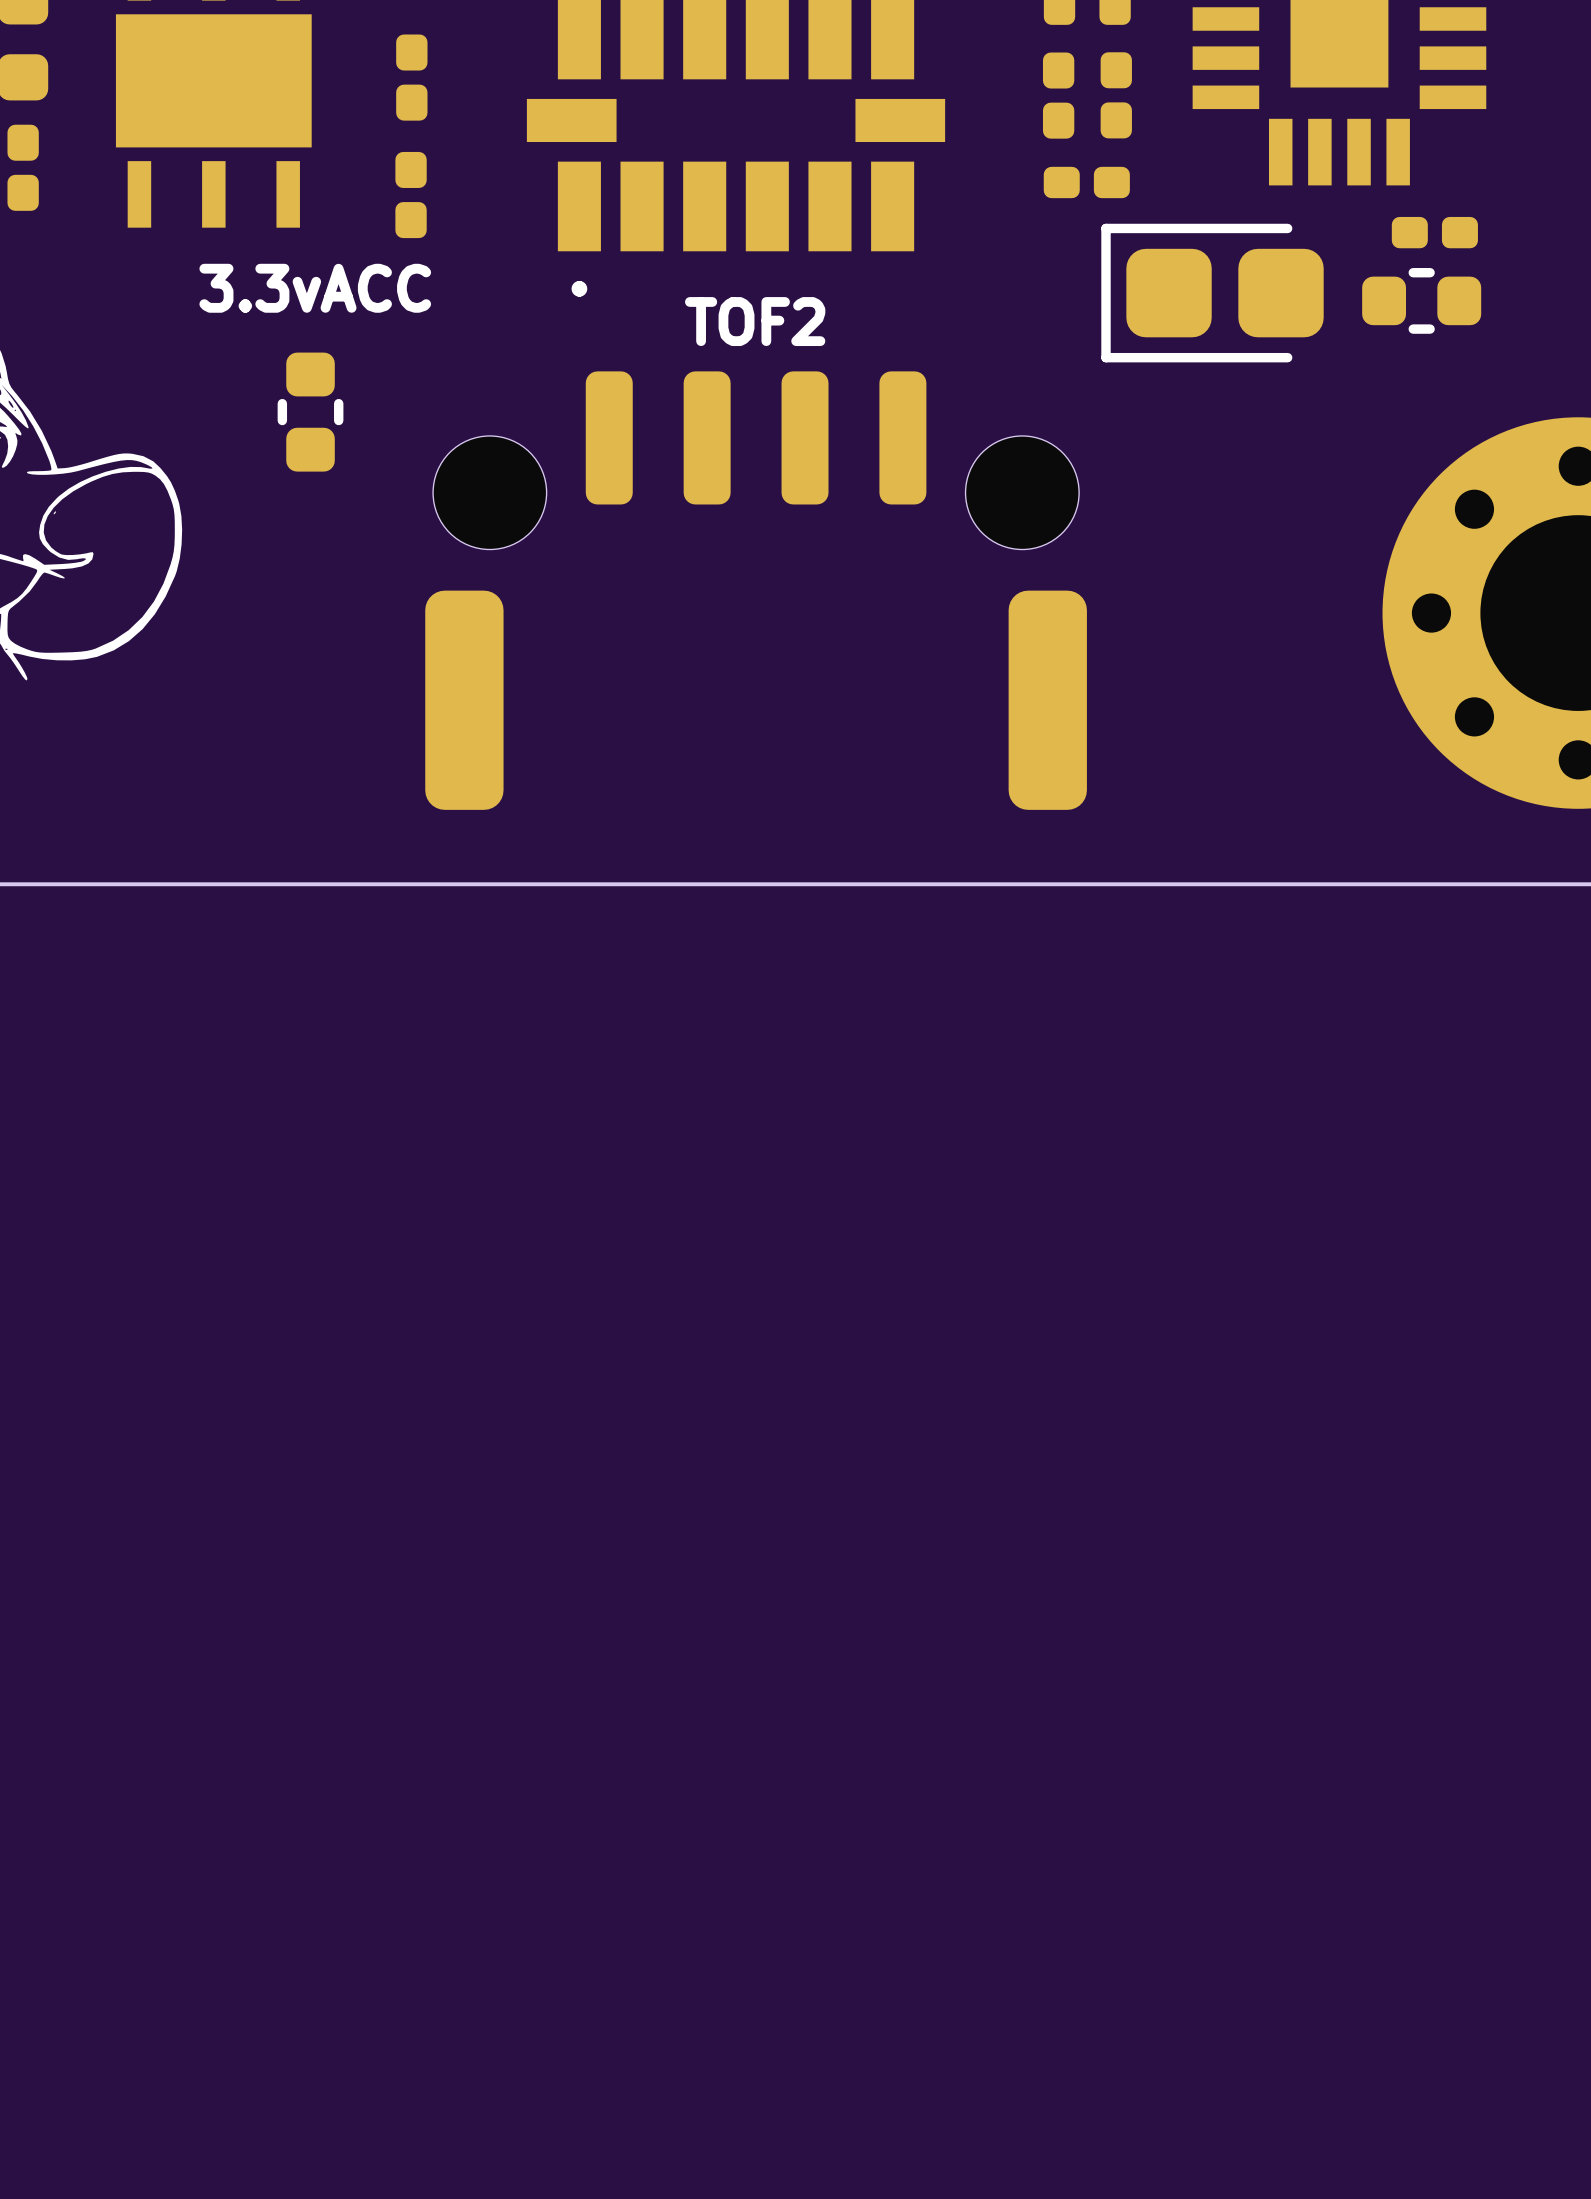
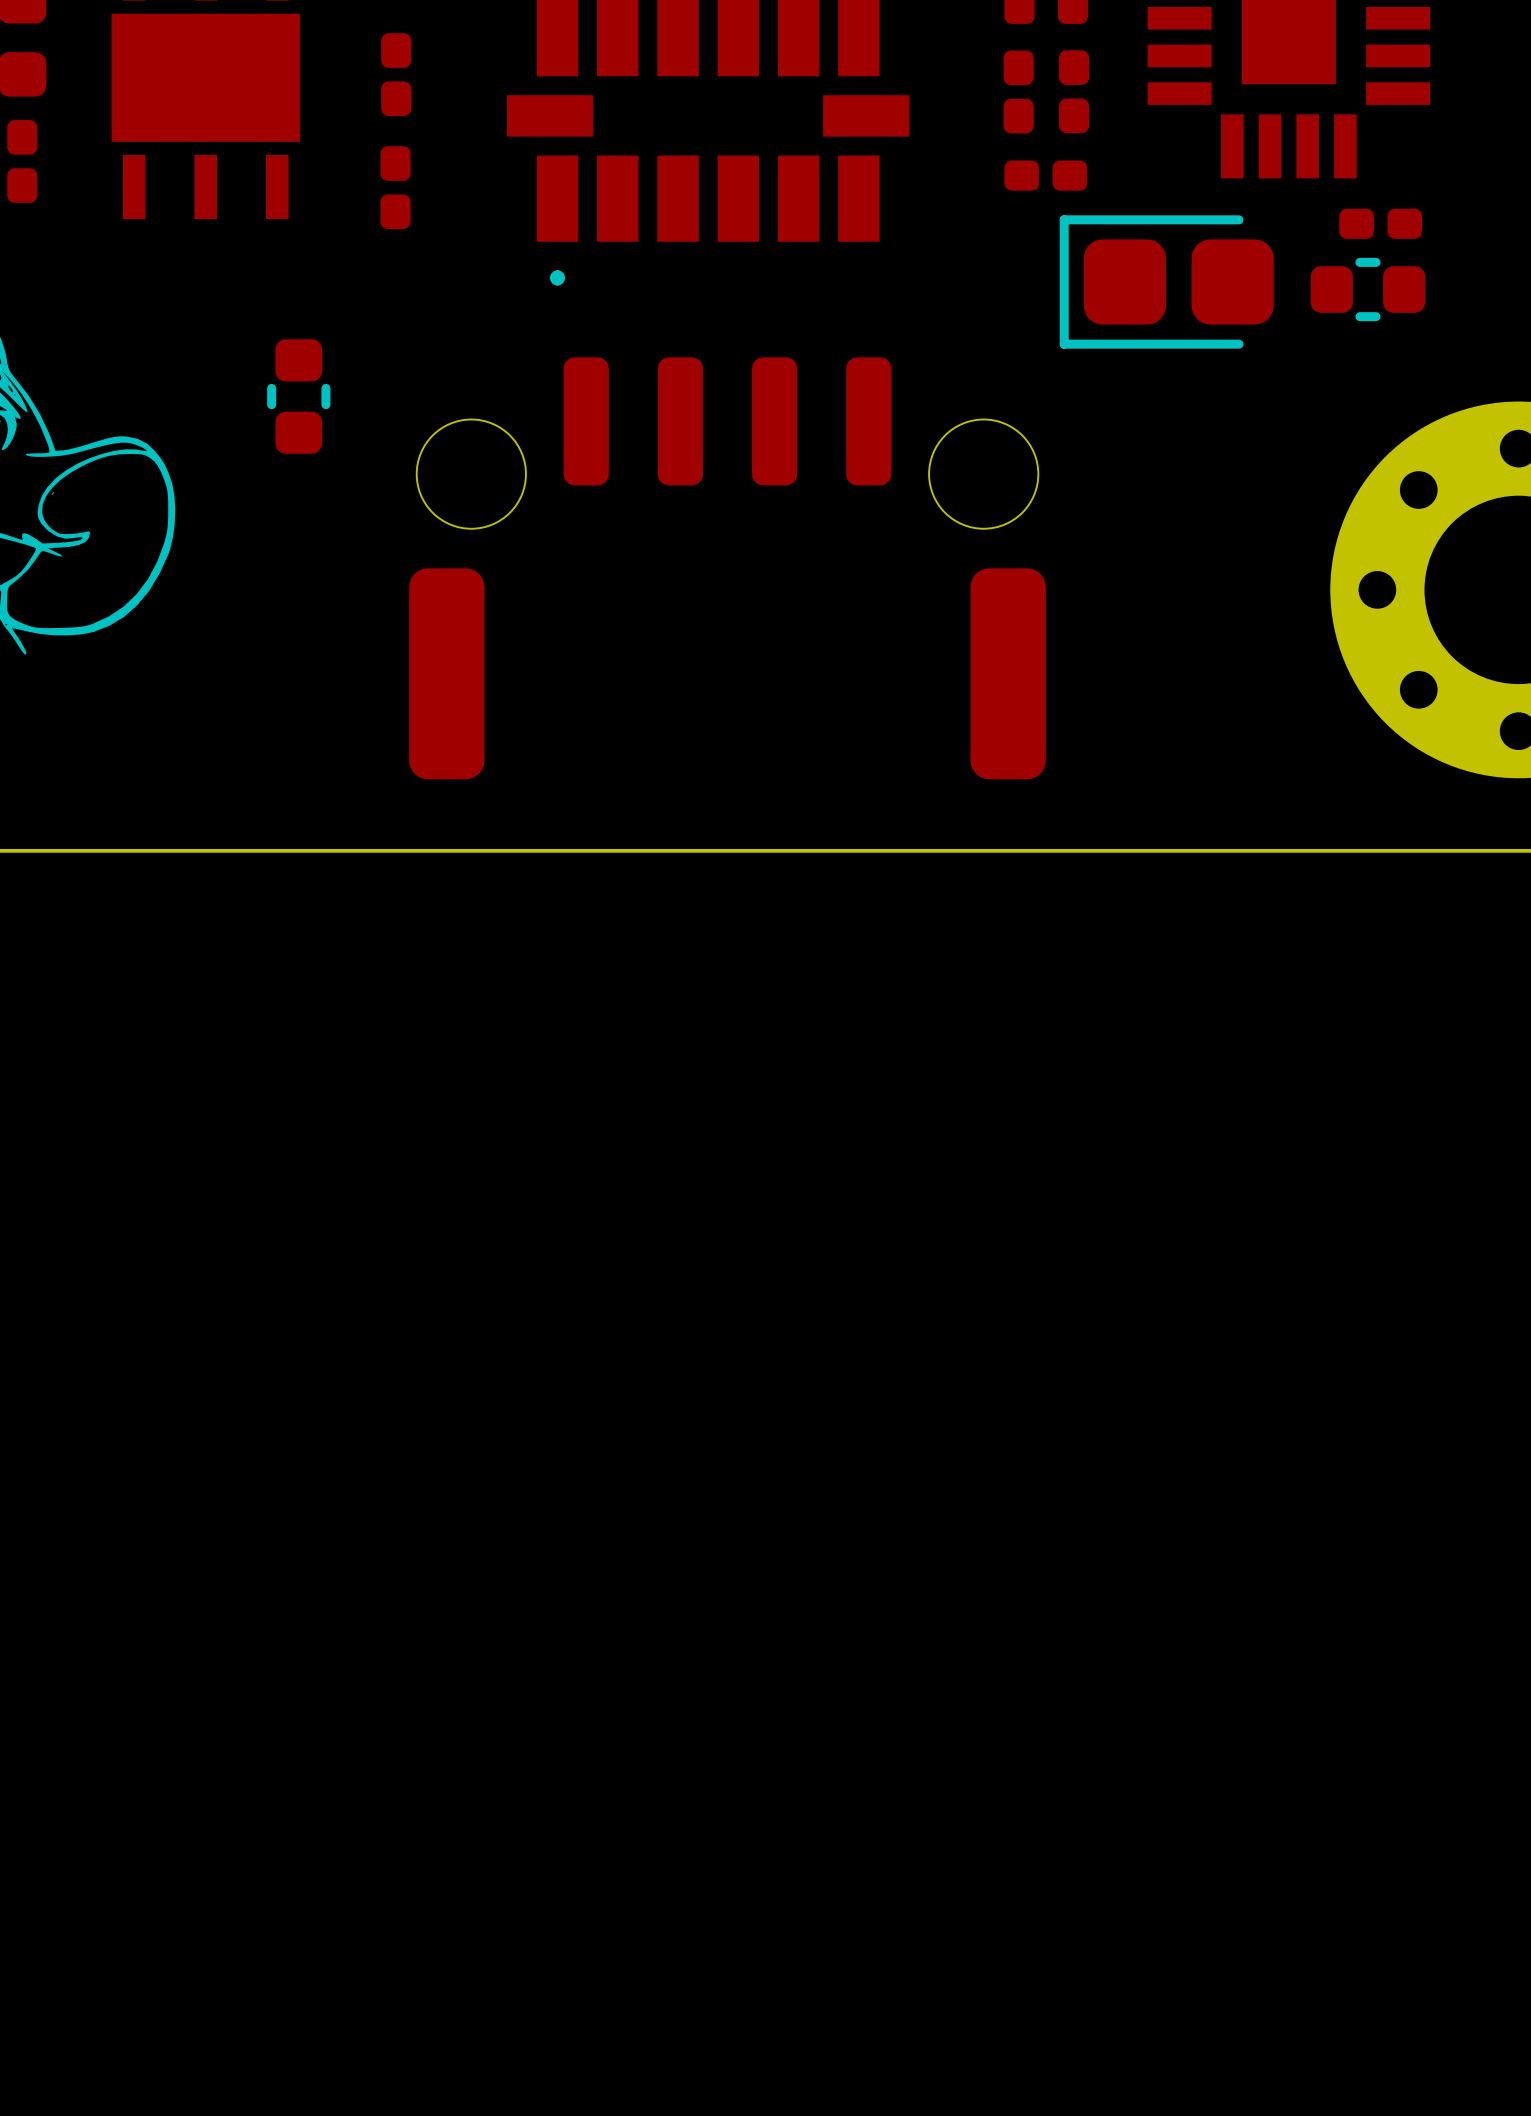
text: 3.3vACC (315, 288) -> none
text: TOF2 (755, 321) -> none

